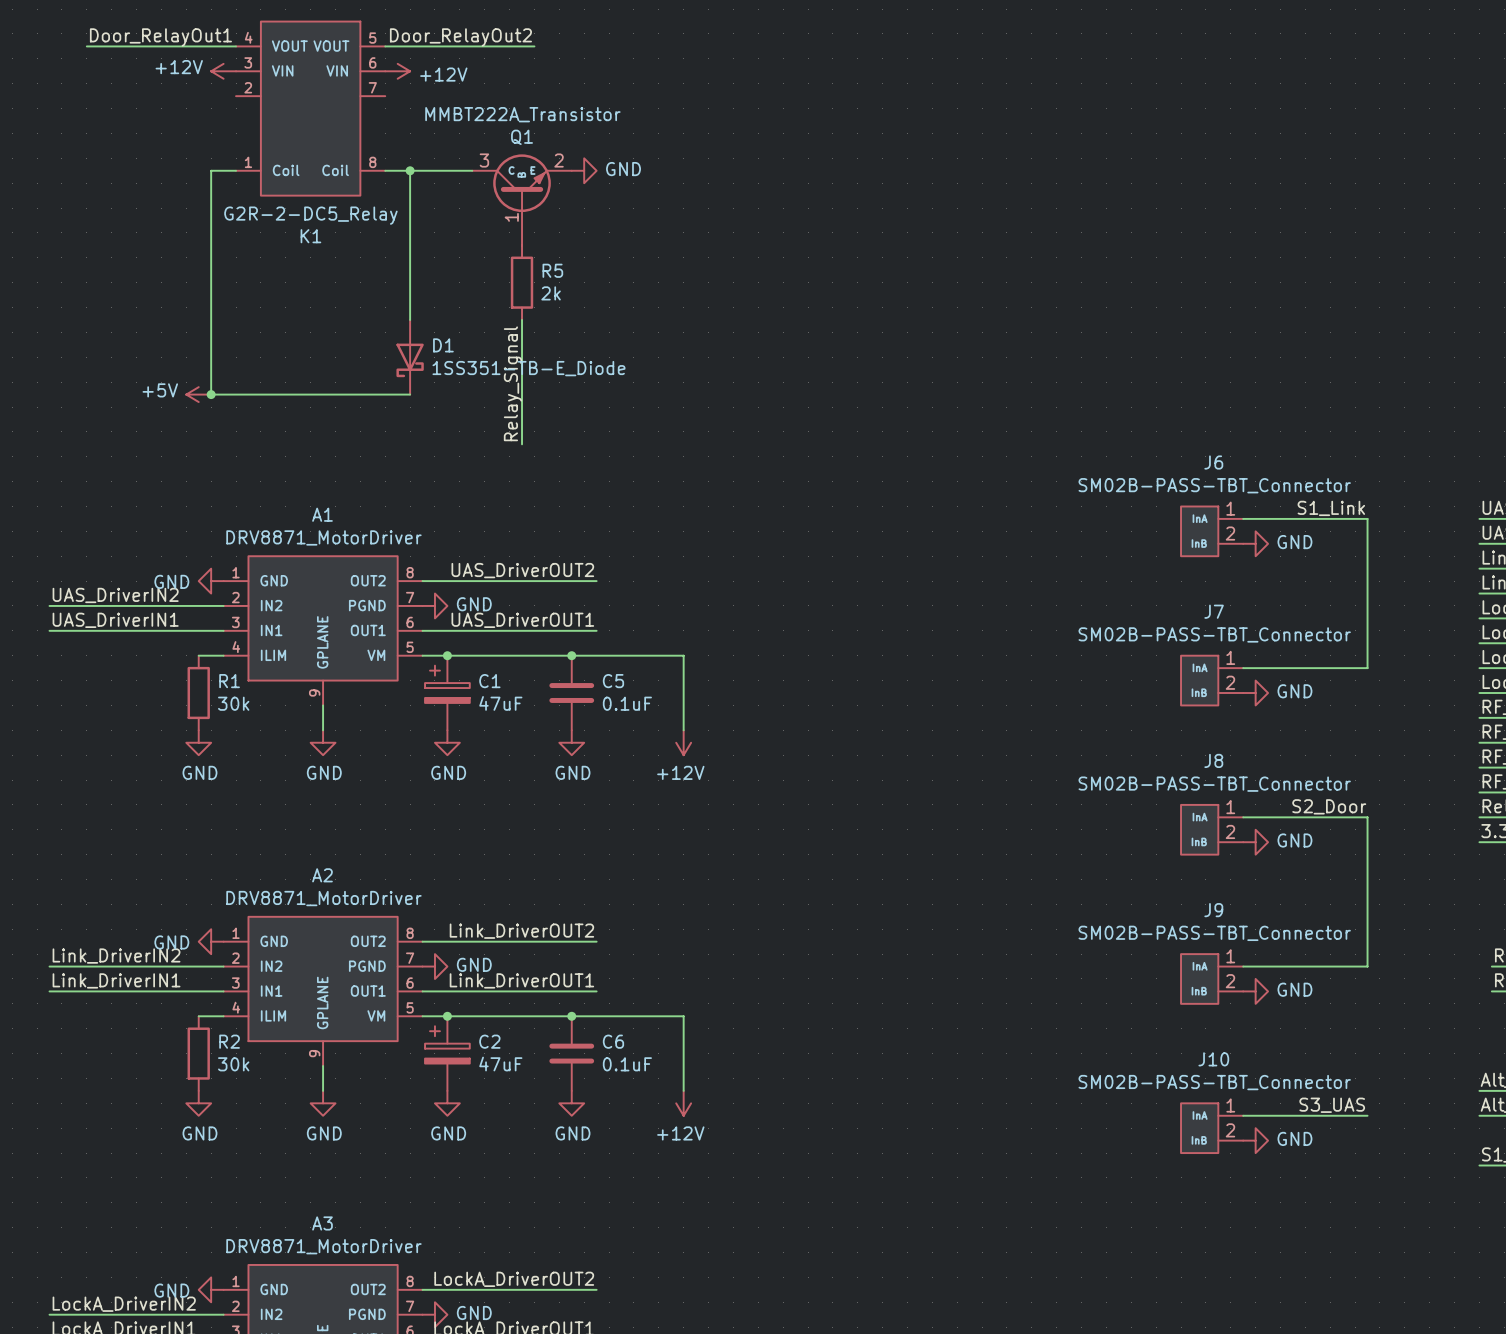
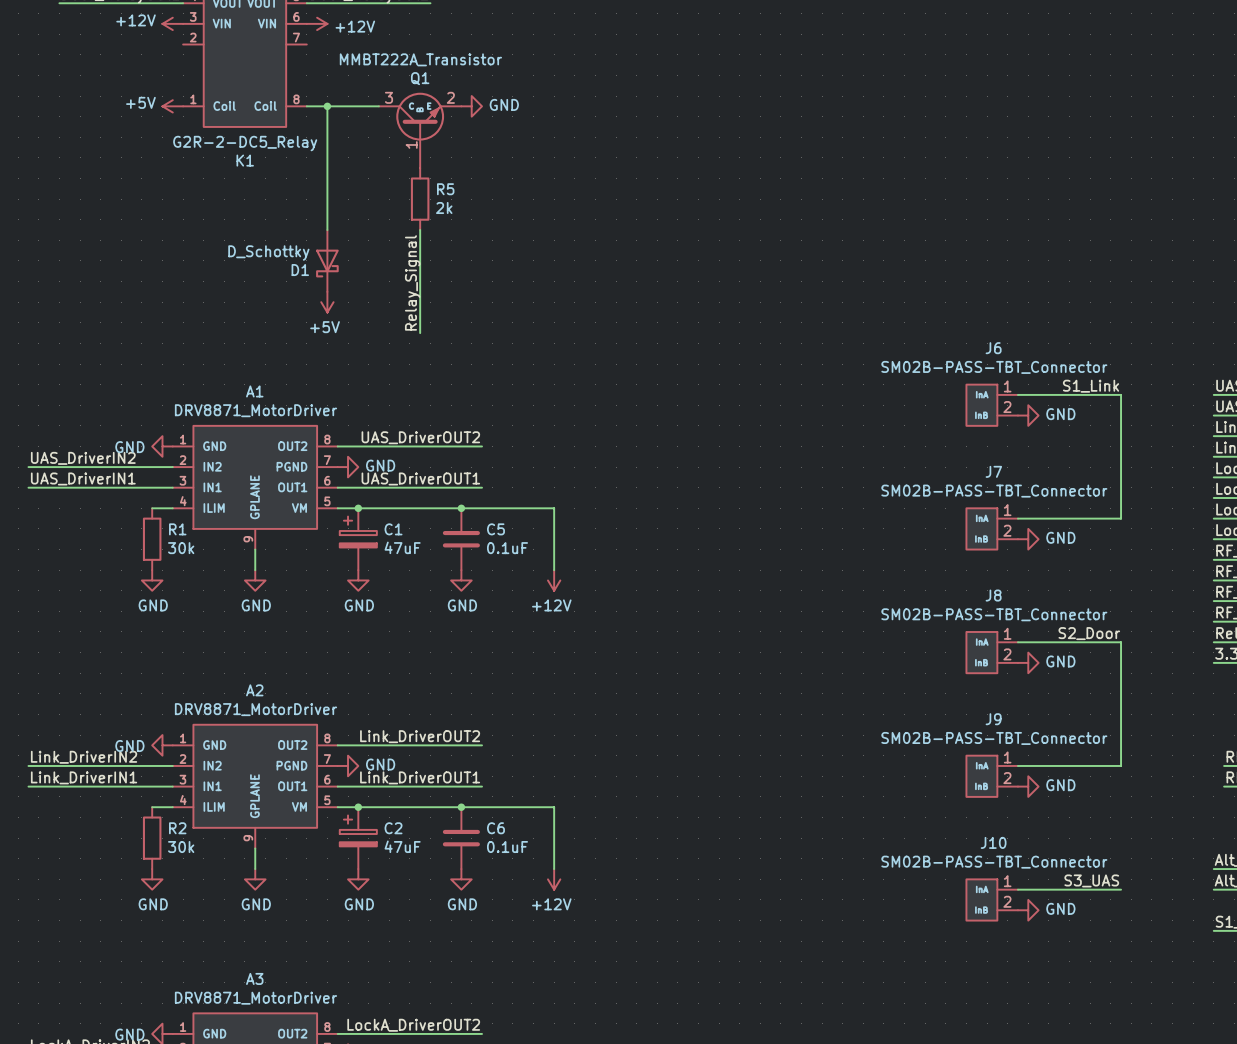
power symbol: none -> +5V (172, 106)
wire: (236, 170) (211, 170) (211, 394) (410, 394) -> none
D1 name position: D1 (443, 345) -> D1 (300, 270)
D1 value: 1SS351-TB-E_Diode (528, 368) -> D_Schottky (268, 253)
power symbol: +5V (198, 394) -> none
junction: (211, 394) -> none
power symbol: none -> +5V (327, 302)

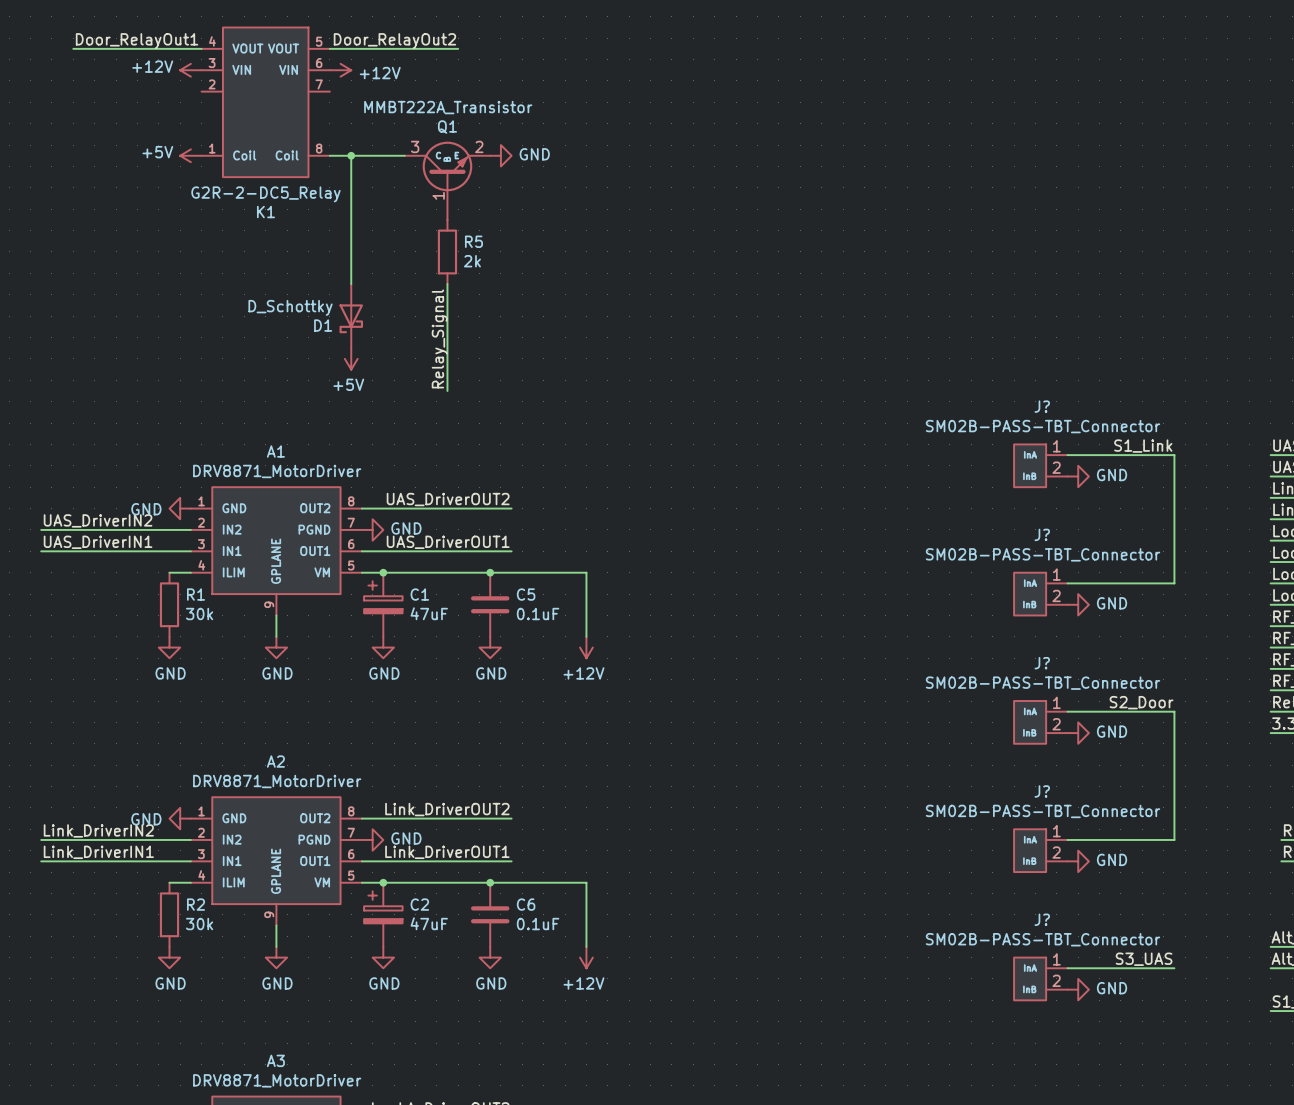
J6 name: J6 (993, 348) -> J? (1042, 406)
J7 name: J7 (993, 471) -> J? (1042, 534)
J8 name: J8 (993, 595) -> J? (1042, 663)
J9 name: J9 (993, 719) -> J? (1042, 791)
J10 name: J10 (993, 842) -> J? (1042, 919)

